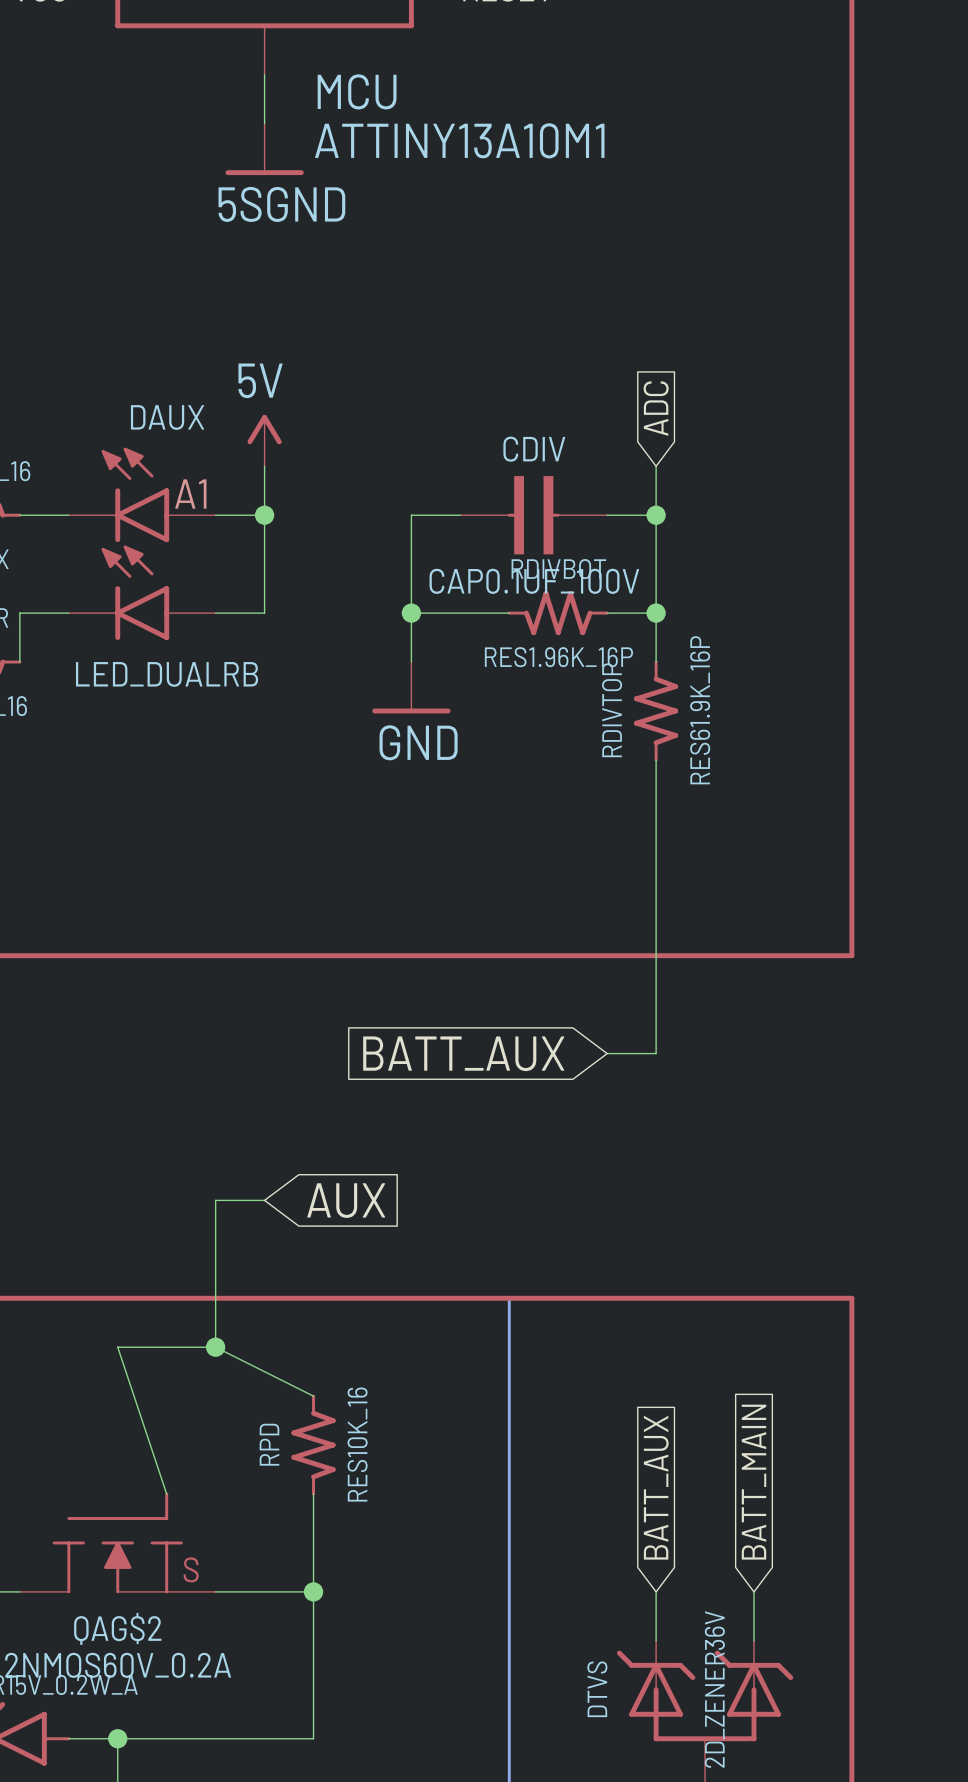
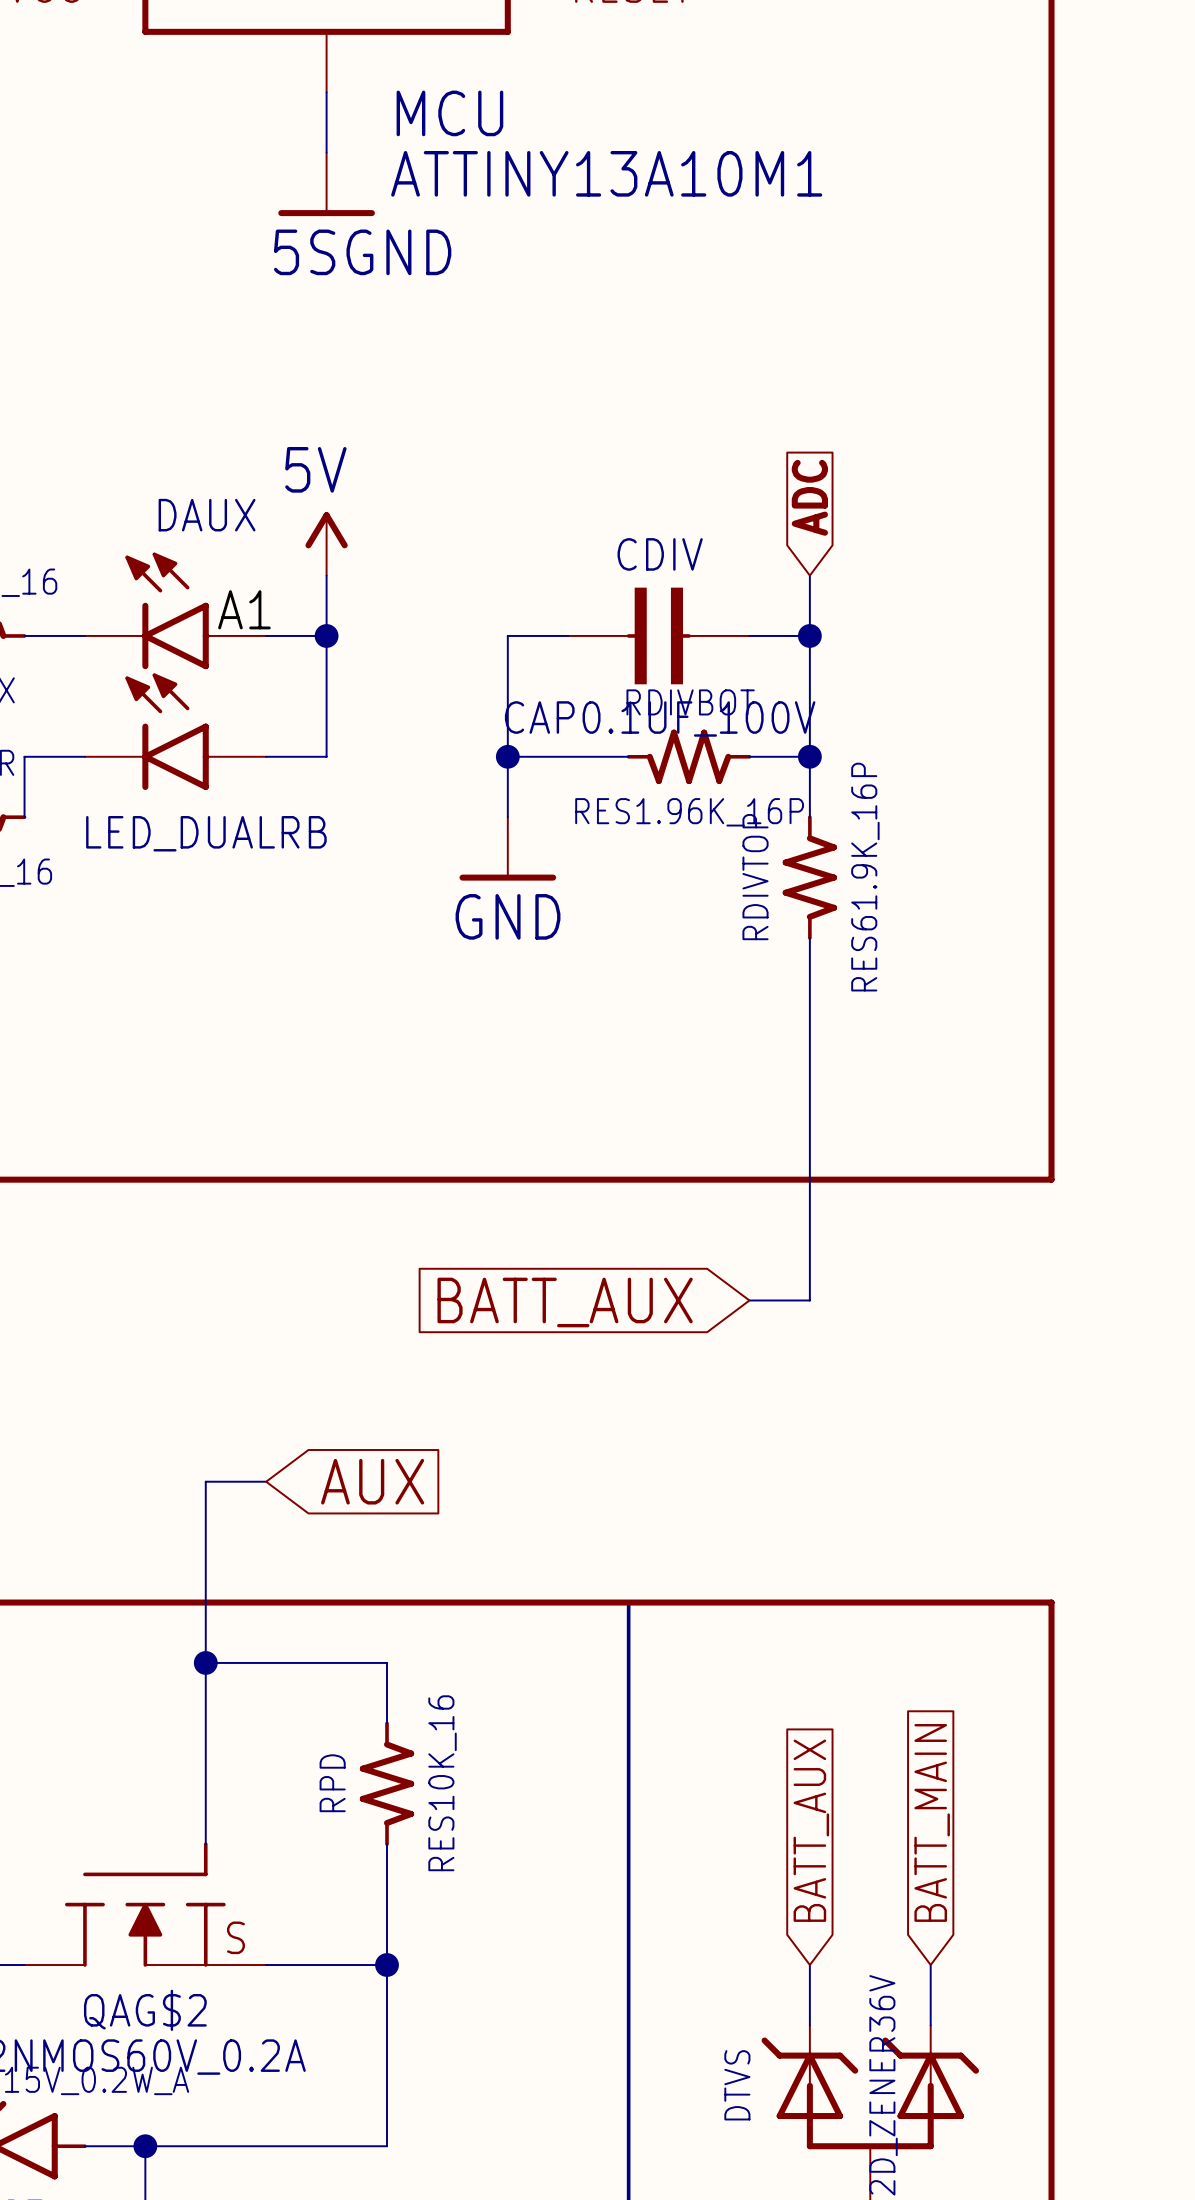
wire: (264, 1200) (215, 1200) (215, 1347) (313, 1396) -> (266, 1662) (387, 1662) (387, 1723)
global label position: AUX (346, 1200) -> AUX (372, 1481)
wire: (166, 1347) (117, 1347) (166, 1494) -> (266, 1481) (205, 1481) (205, 1844)
junction position: (215, 1347) -> (205, 1662)

